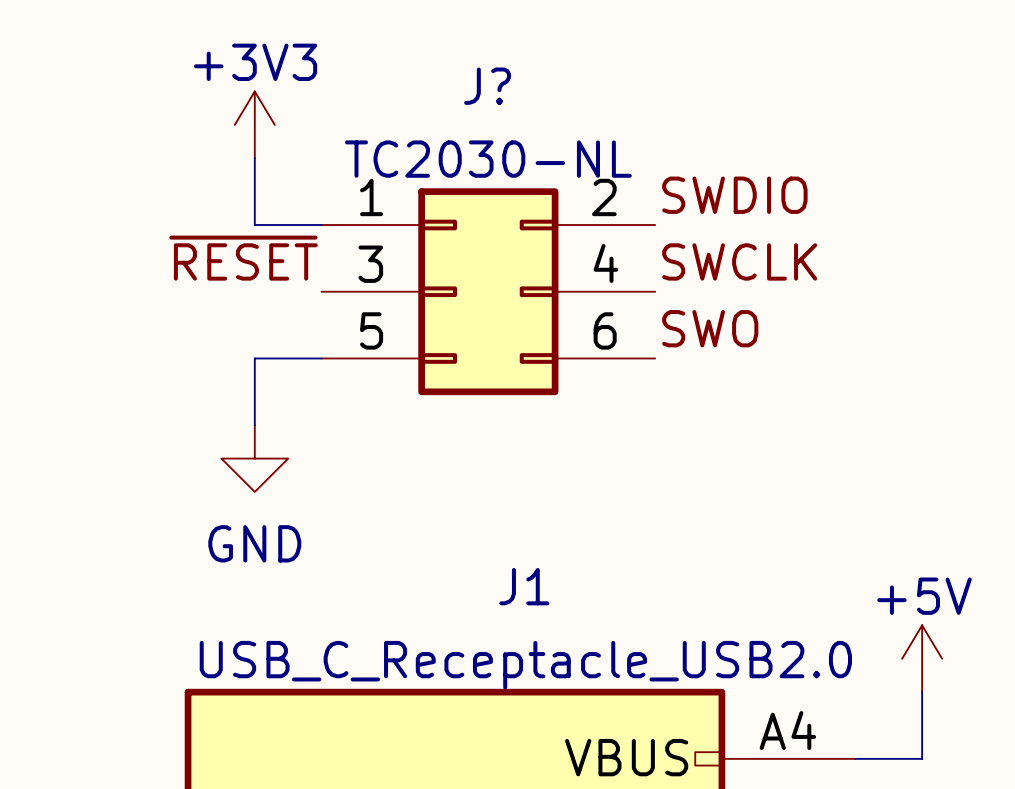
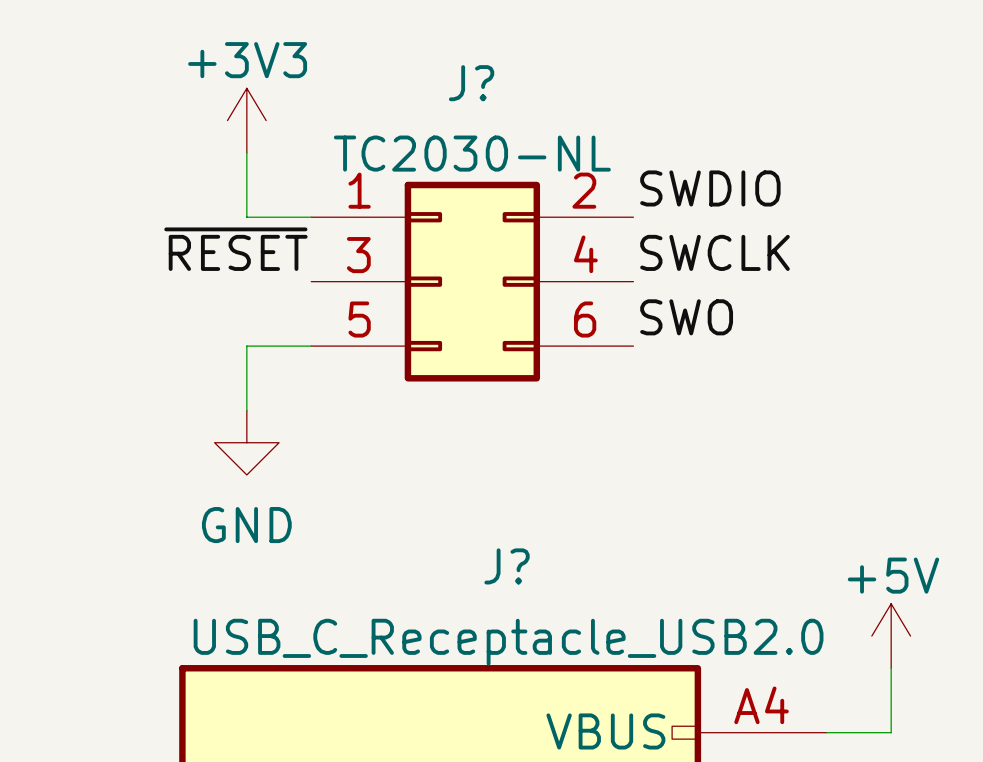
J1 name: J1 (524, 586) -> J? (507, 566)

